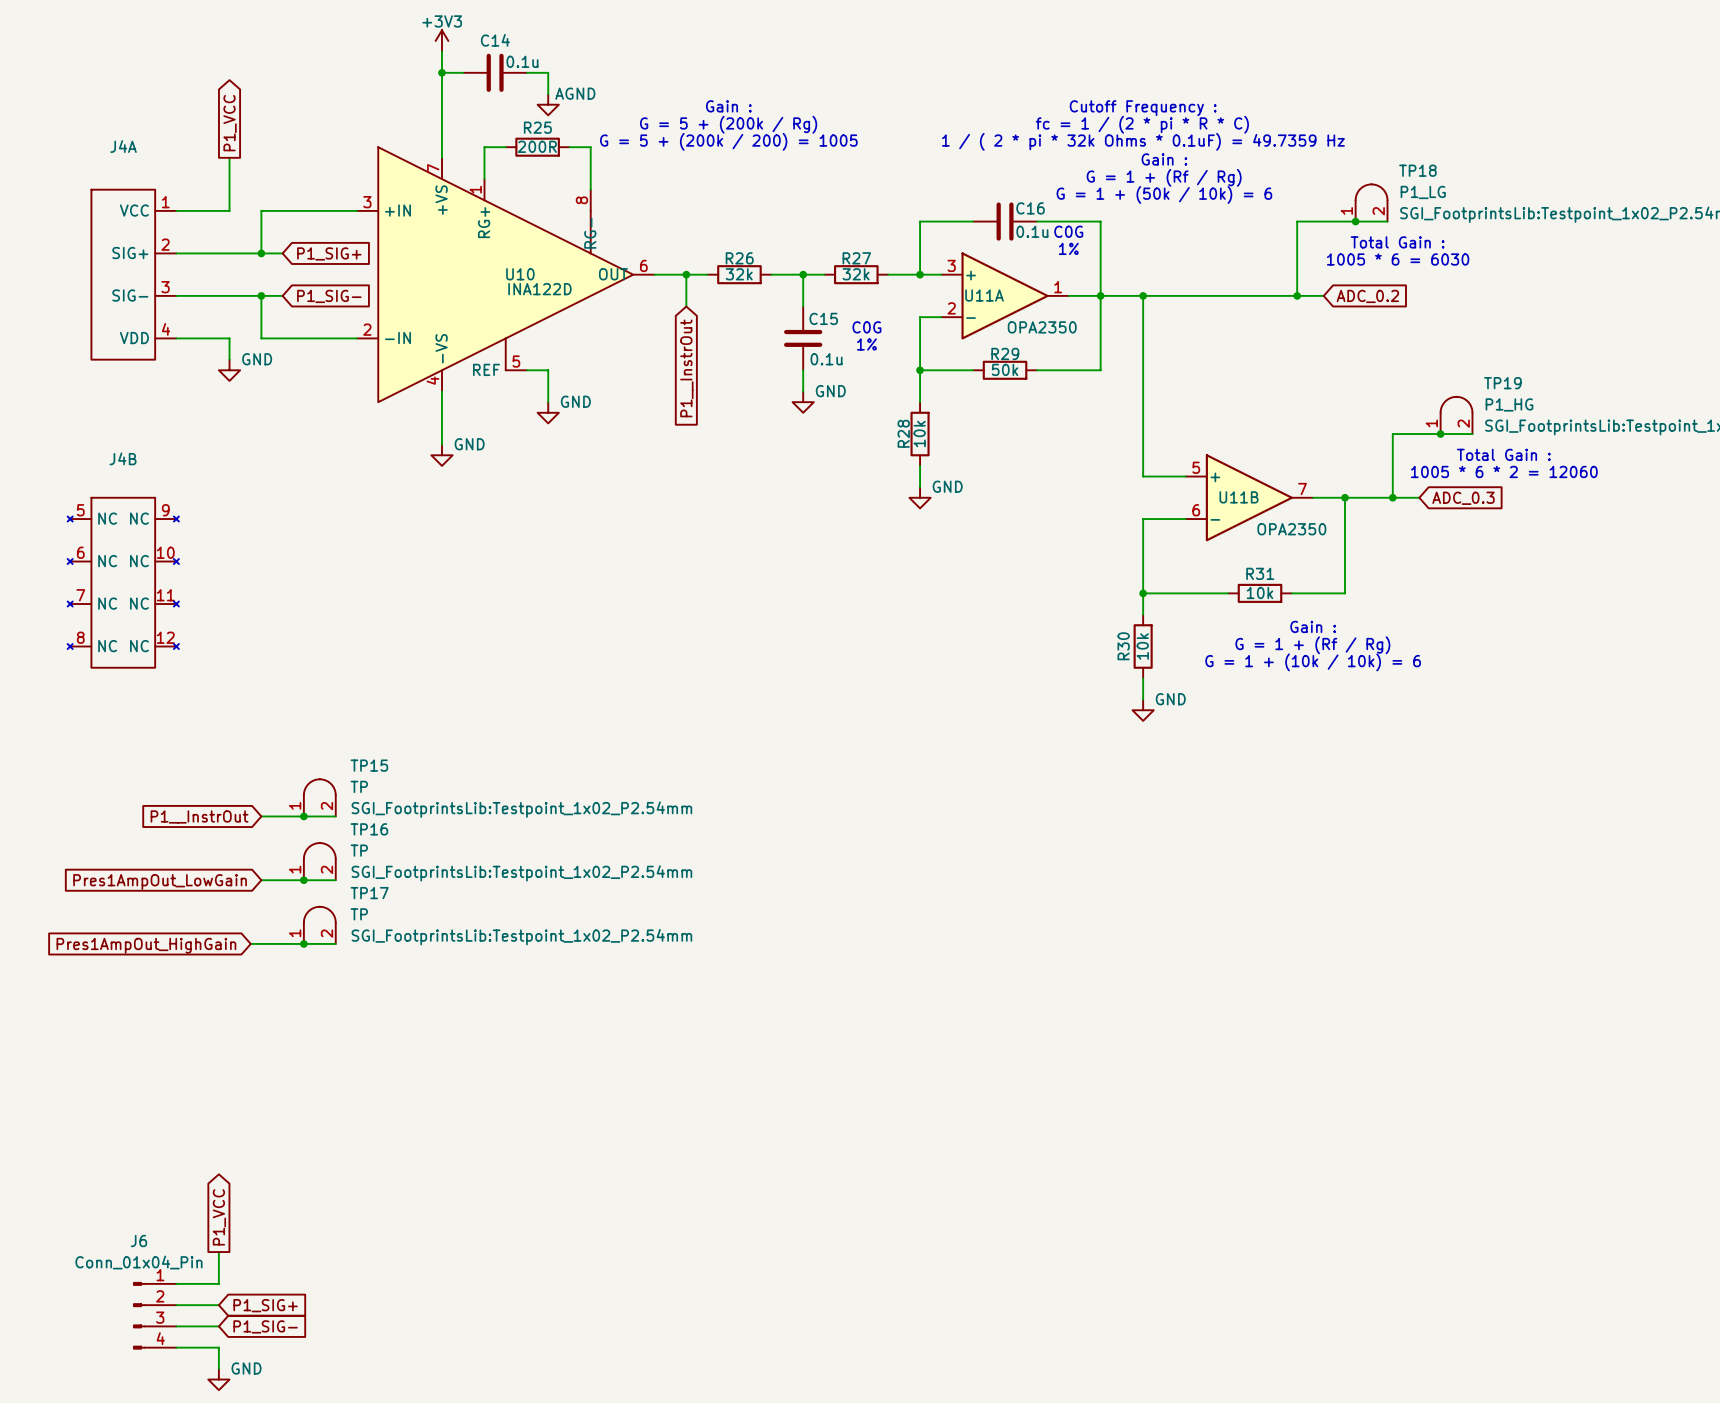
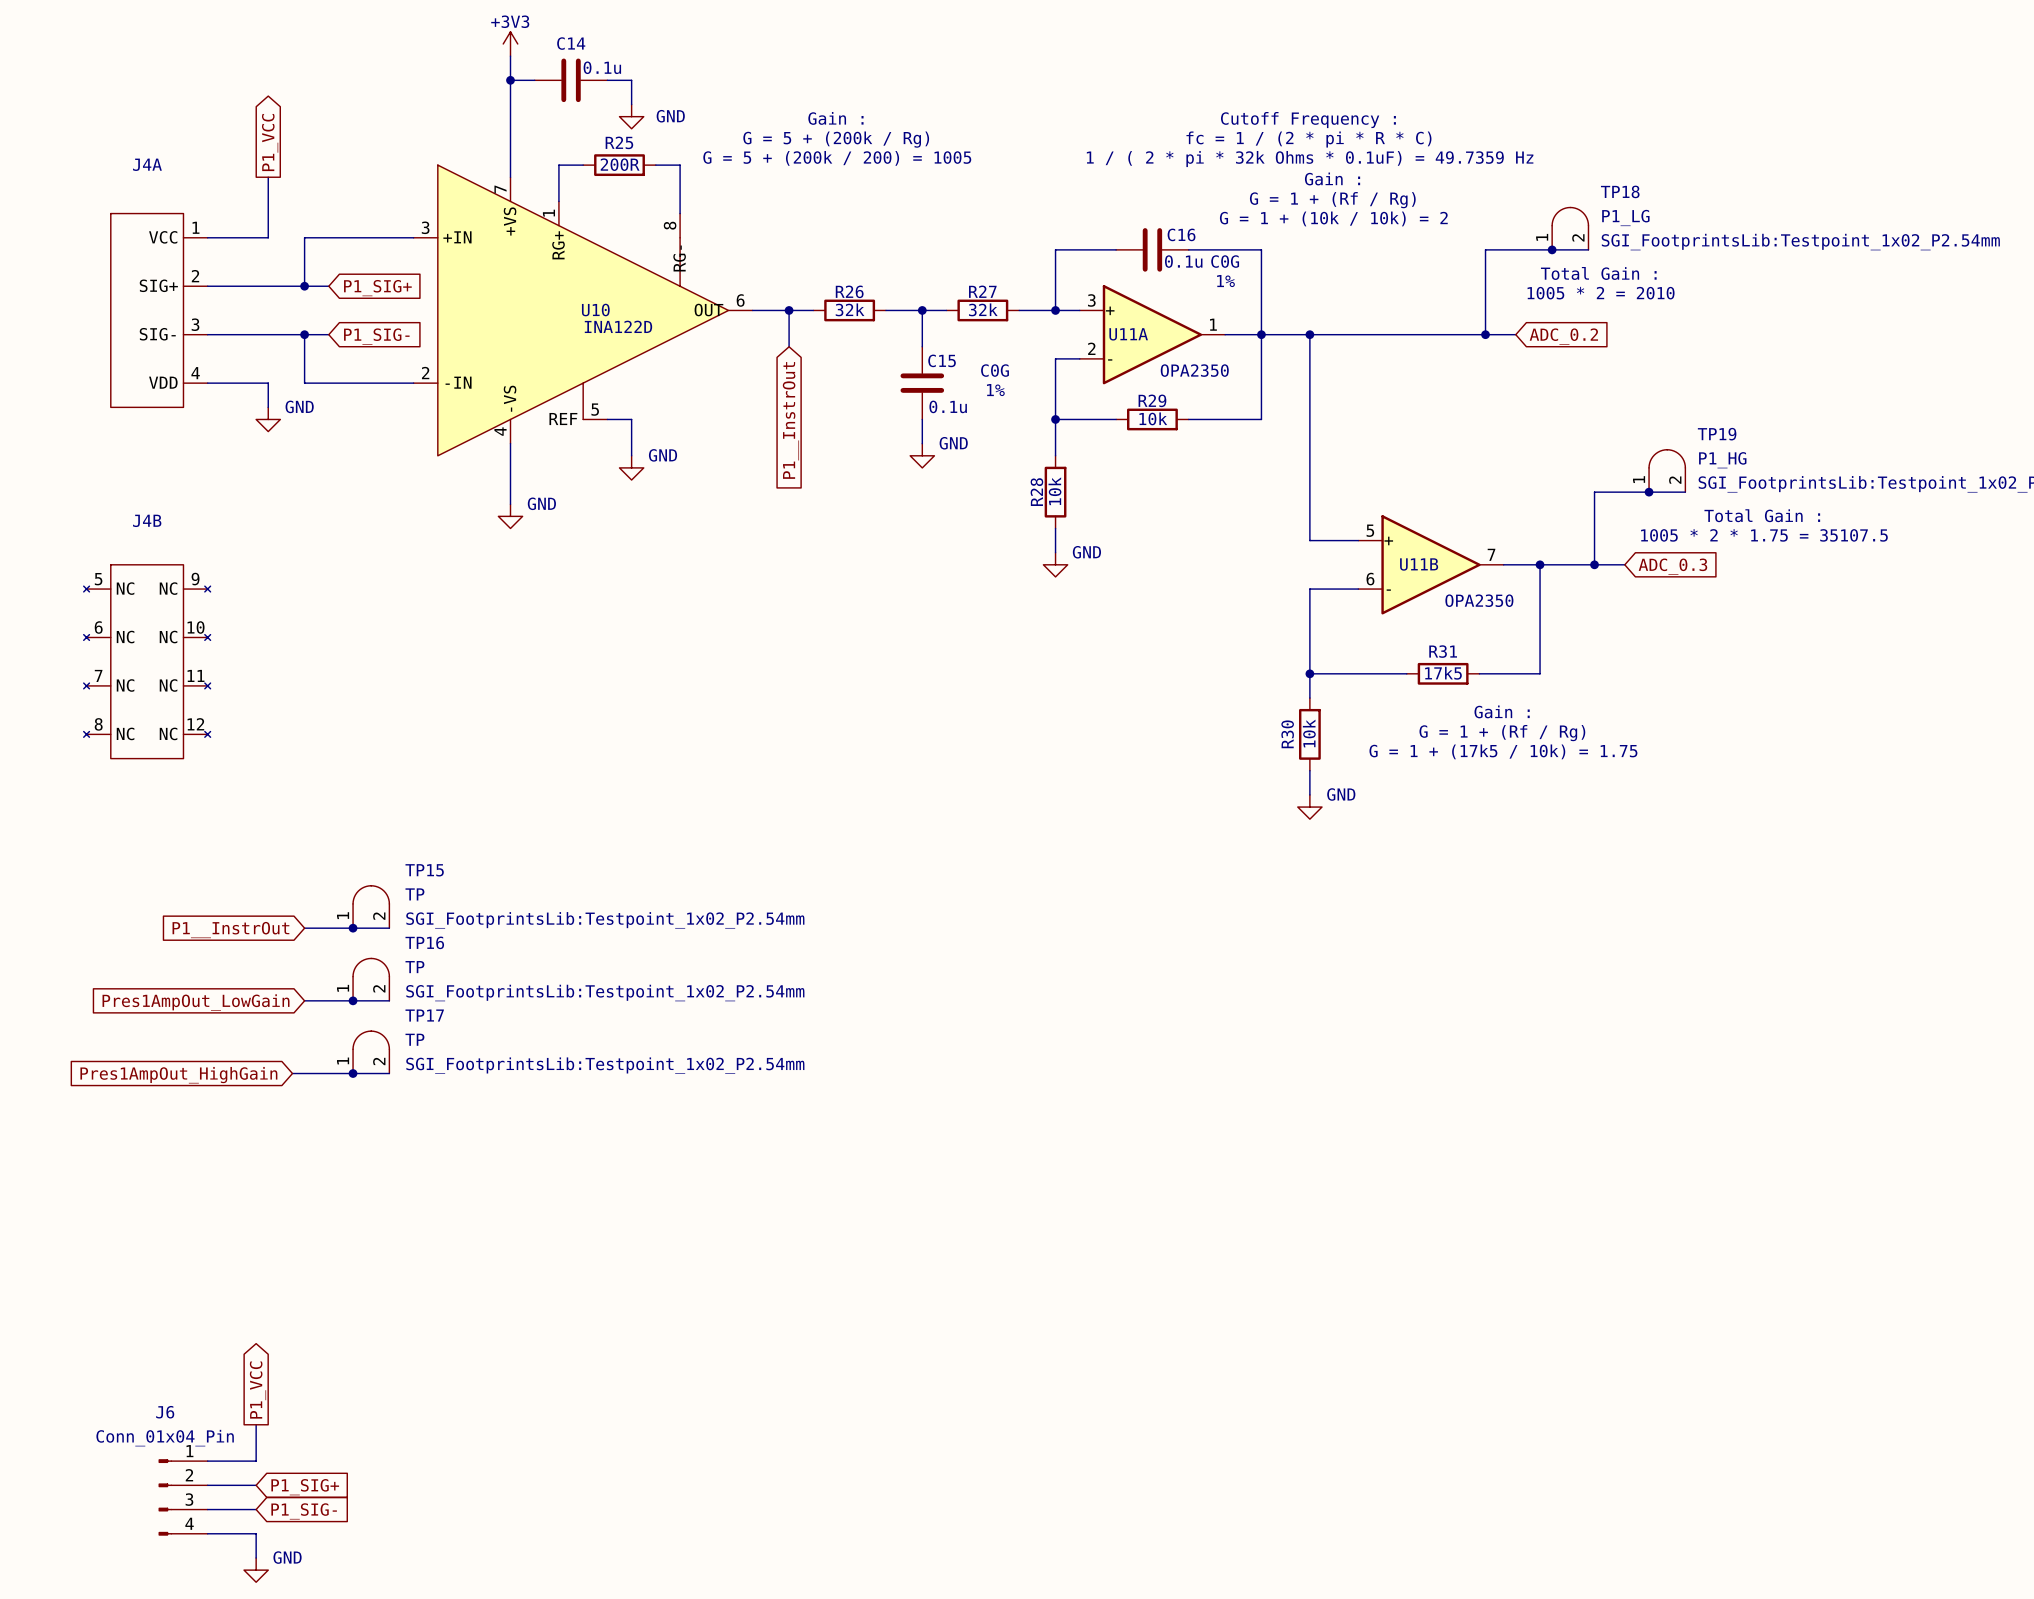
power symbol: AGND (548, 104) -> GND (631, 116)
text: G = 1 + (50k / 10k) = 6 (1164, 194) -> G = 1 + (10k / 10k) = 2 (1333, 218)
text: 1005 * 6 = 6030 (1398, 259) -> 1005 * 2 = 2010 (1601, 293)
R29 value: 50k (1005, 369) -> 10k (1153, 418)
text position: Total Gain : (1503, 454) -> Total Gain : (1762, 515)
text: 1005 * 6 * 2 = 12060 (1504, 471) -> 1005 * 2 * 1.75 = 35107.5 (1764, 535)
R31 value: 10k (1260, 592) -> 17k5 (1443, 673)
text: G = 1 + (10k / 10k) = 6 (1313, 662) -> G = 1 + (17k5 / 10k) = 1.75 (1503, 751)

